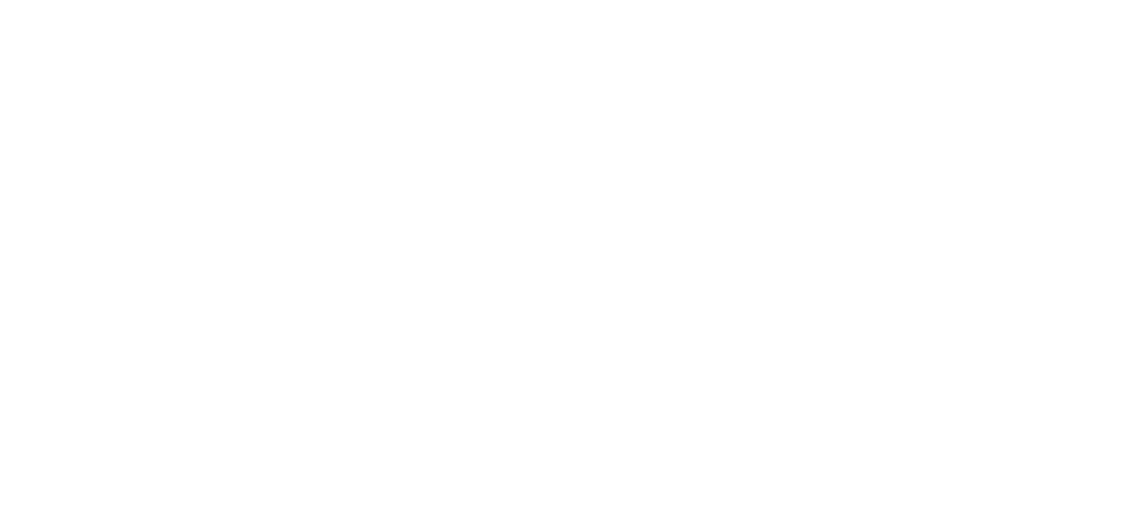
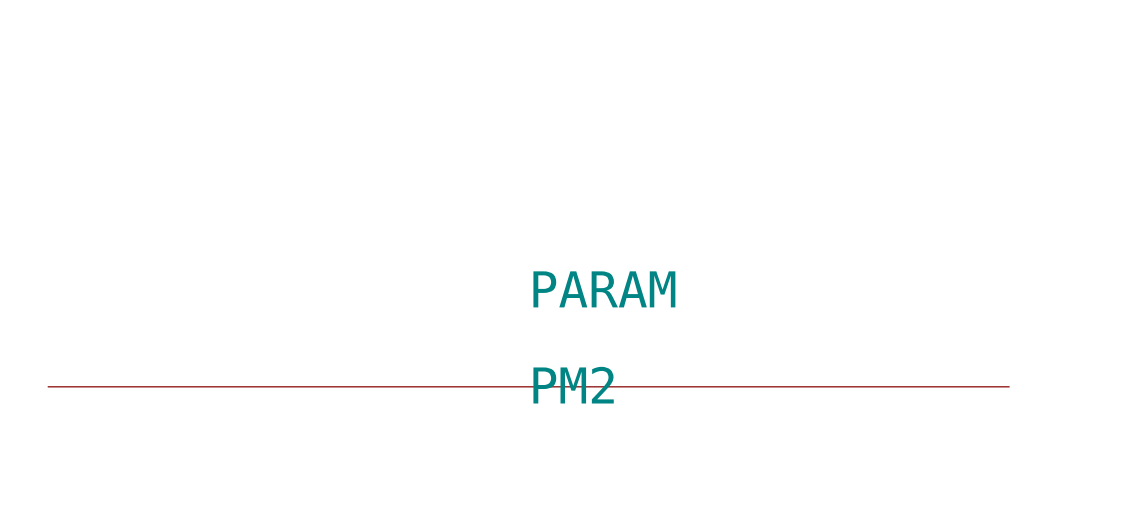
PM2: none -> PARAM (528, 386)

